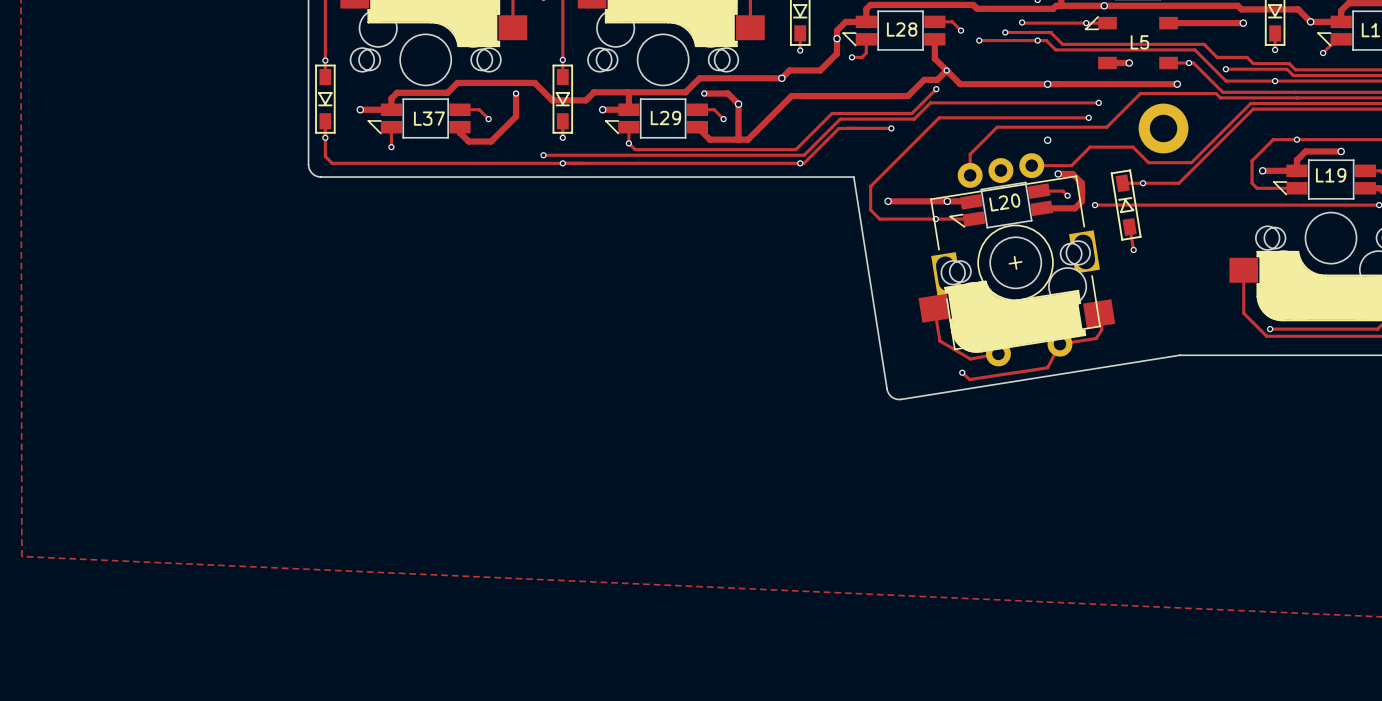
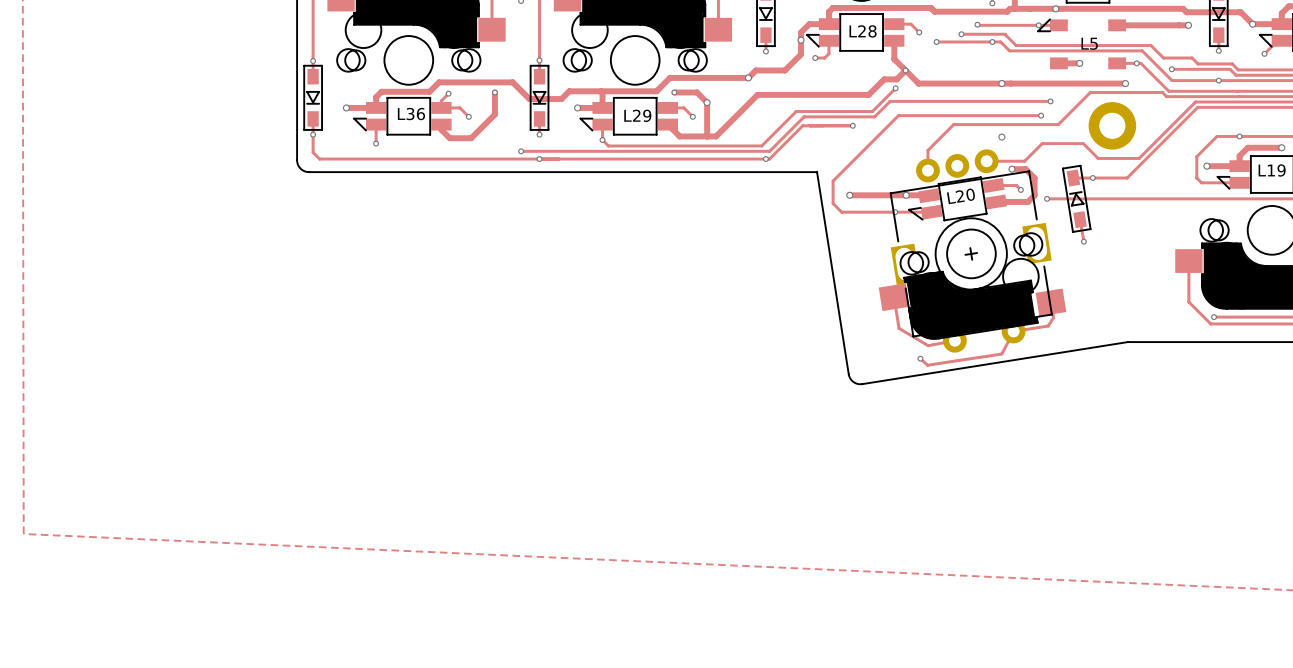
track: none -> (448, 93) (441, 100) (441, 107)
via: none -> (448, 93)
L37 name: L37 (429, 118) -> L36 (411, 114)

